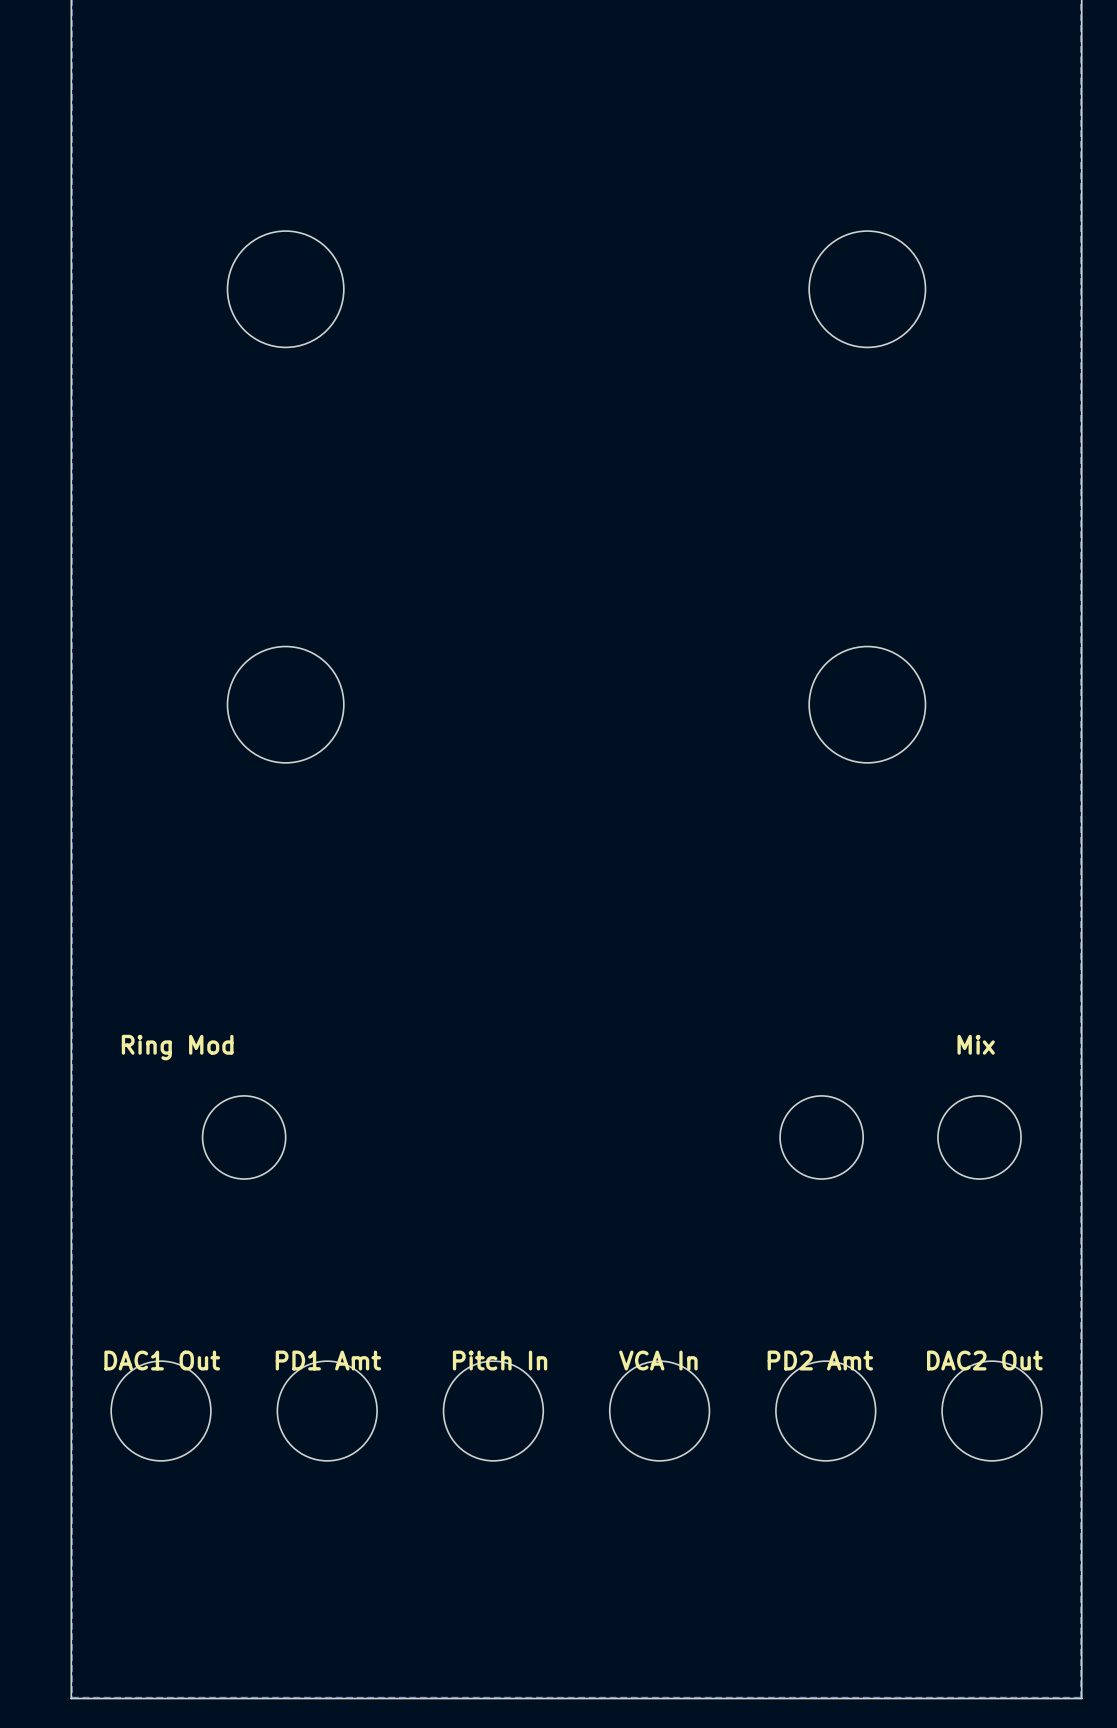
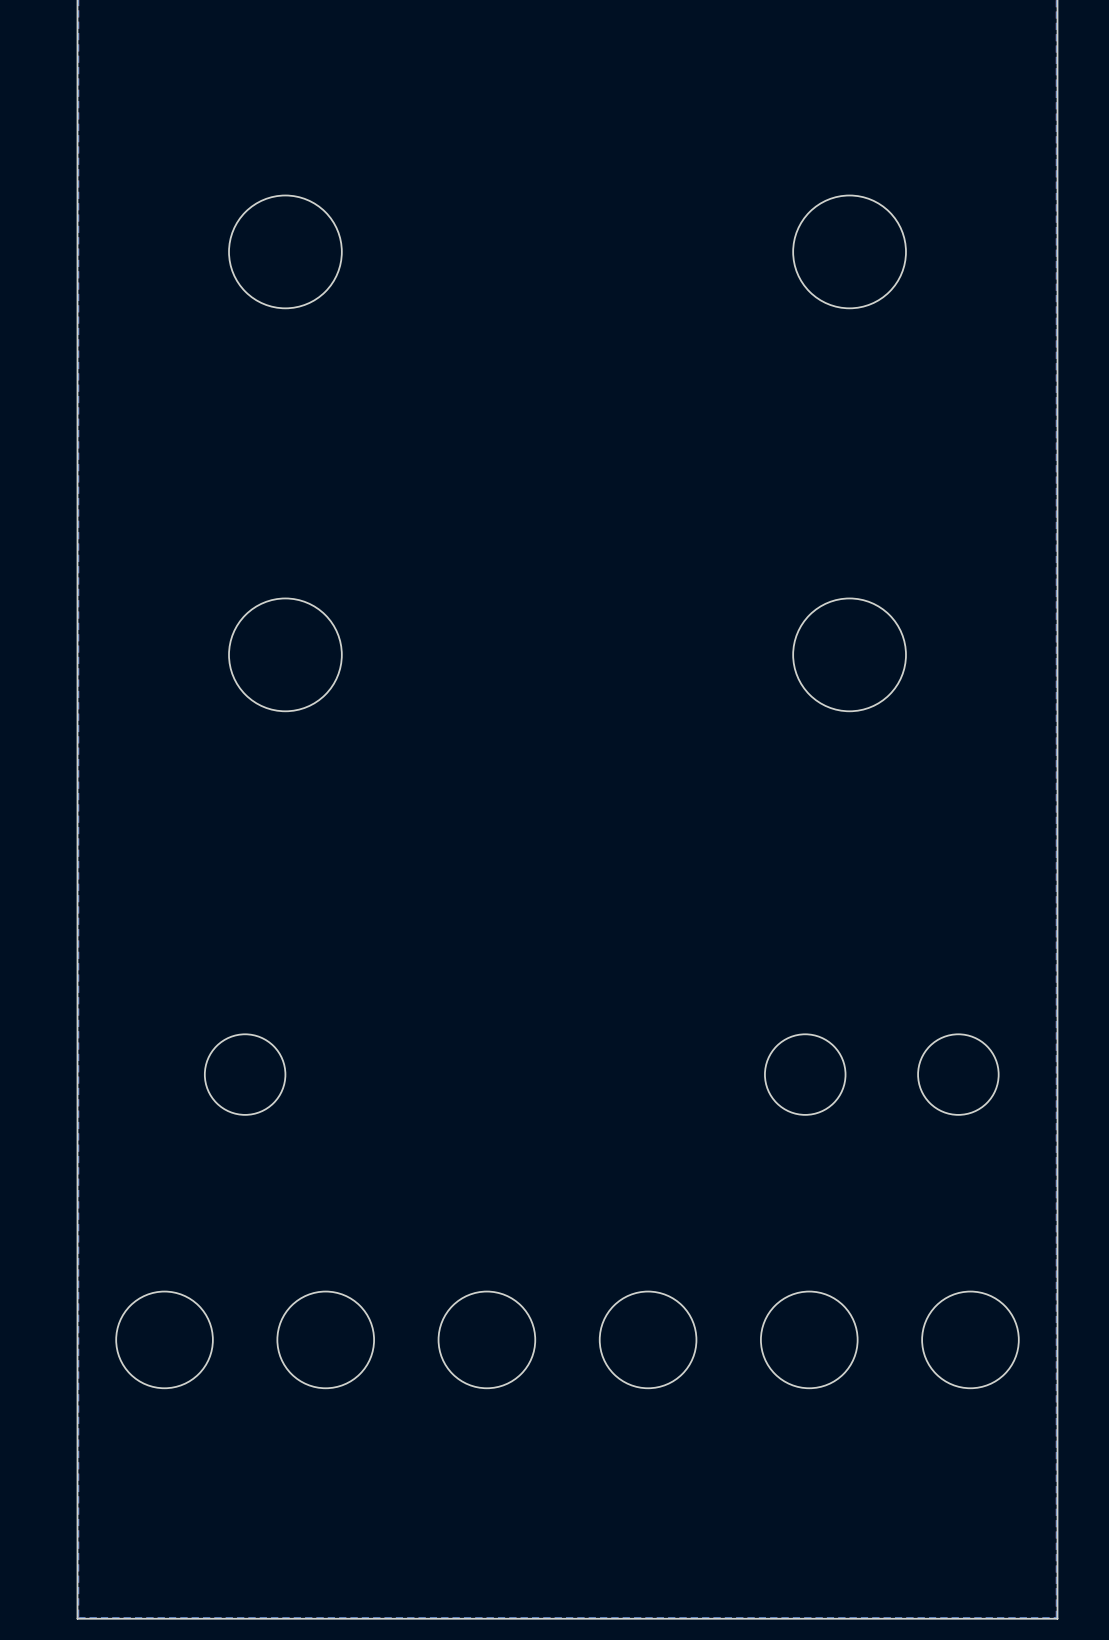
text: Mix (976, 1044) -> none
text: Ring Mod (177, 1047) -> none
text: DAC1 Out (162, 1360) -> none
text: PD1 Amt (328, 1360) -> none
text: Pitch In (500, 1360) -> none
text: VCA In (658, 1360) -> none
text: PD2 Amt (820, 1360) -> none
text: DAC2 Out (984, 1360) -> none

